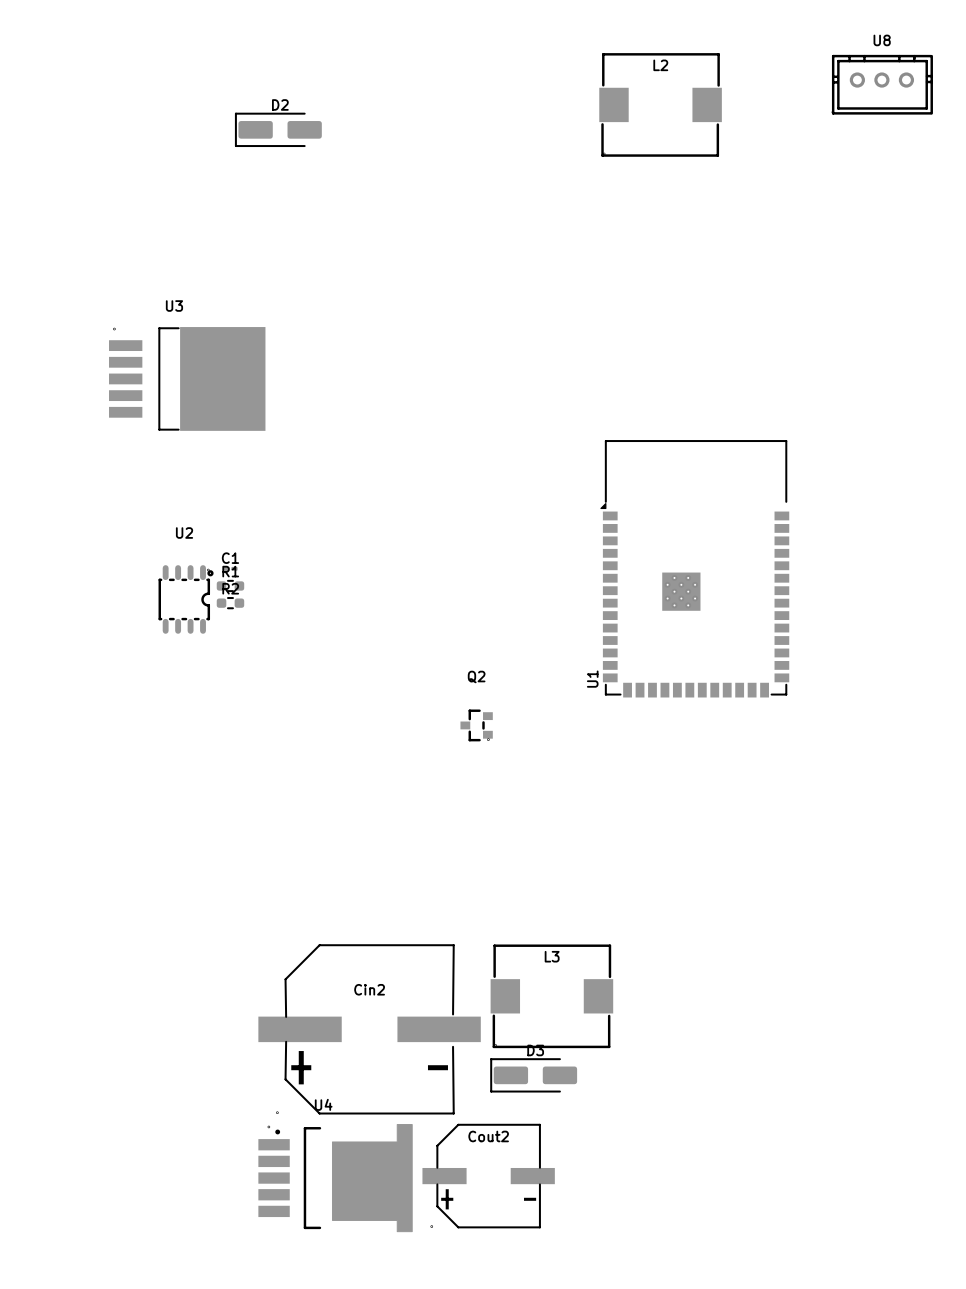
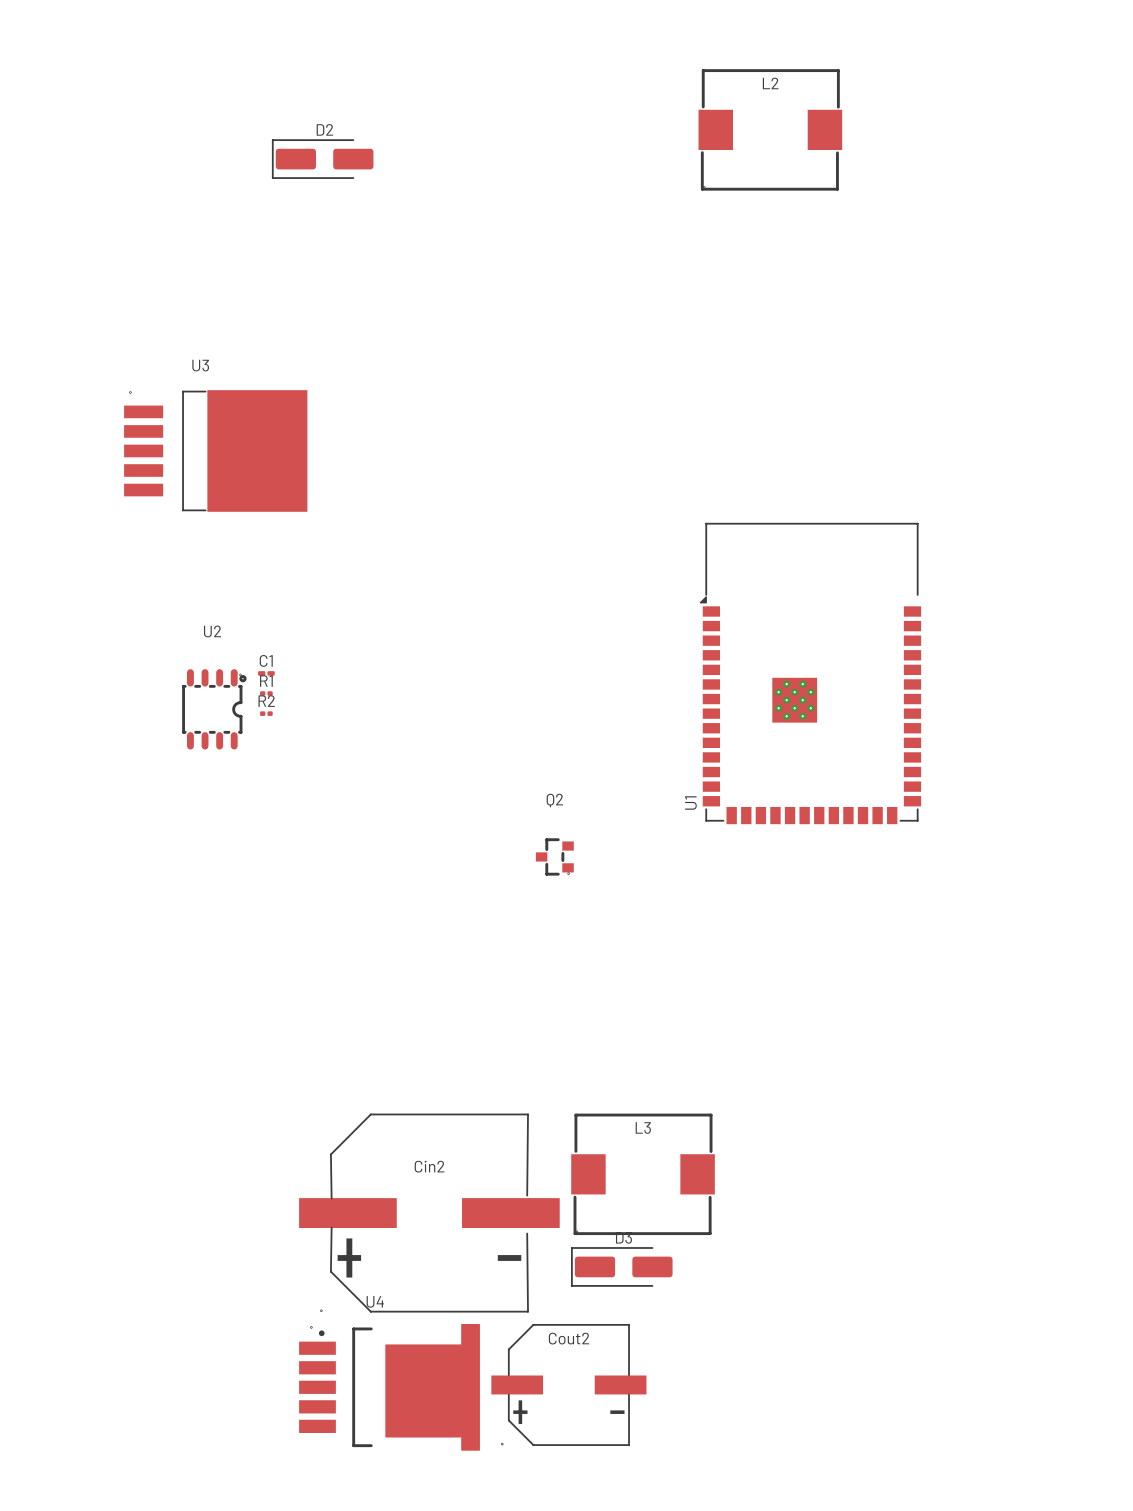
U8: (882, 84) -> none
R1 footprint: [216, 580, 245, 592] -> [260, 691, 273, 696]
R2 footprint: [216, 597, 245, 609] -> [260, 711, 273, 716]

